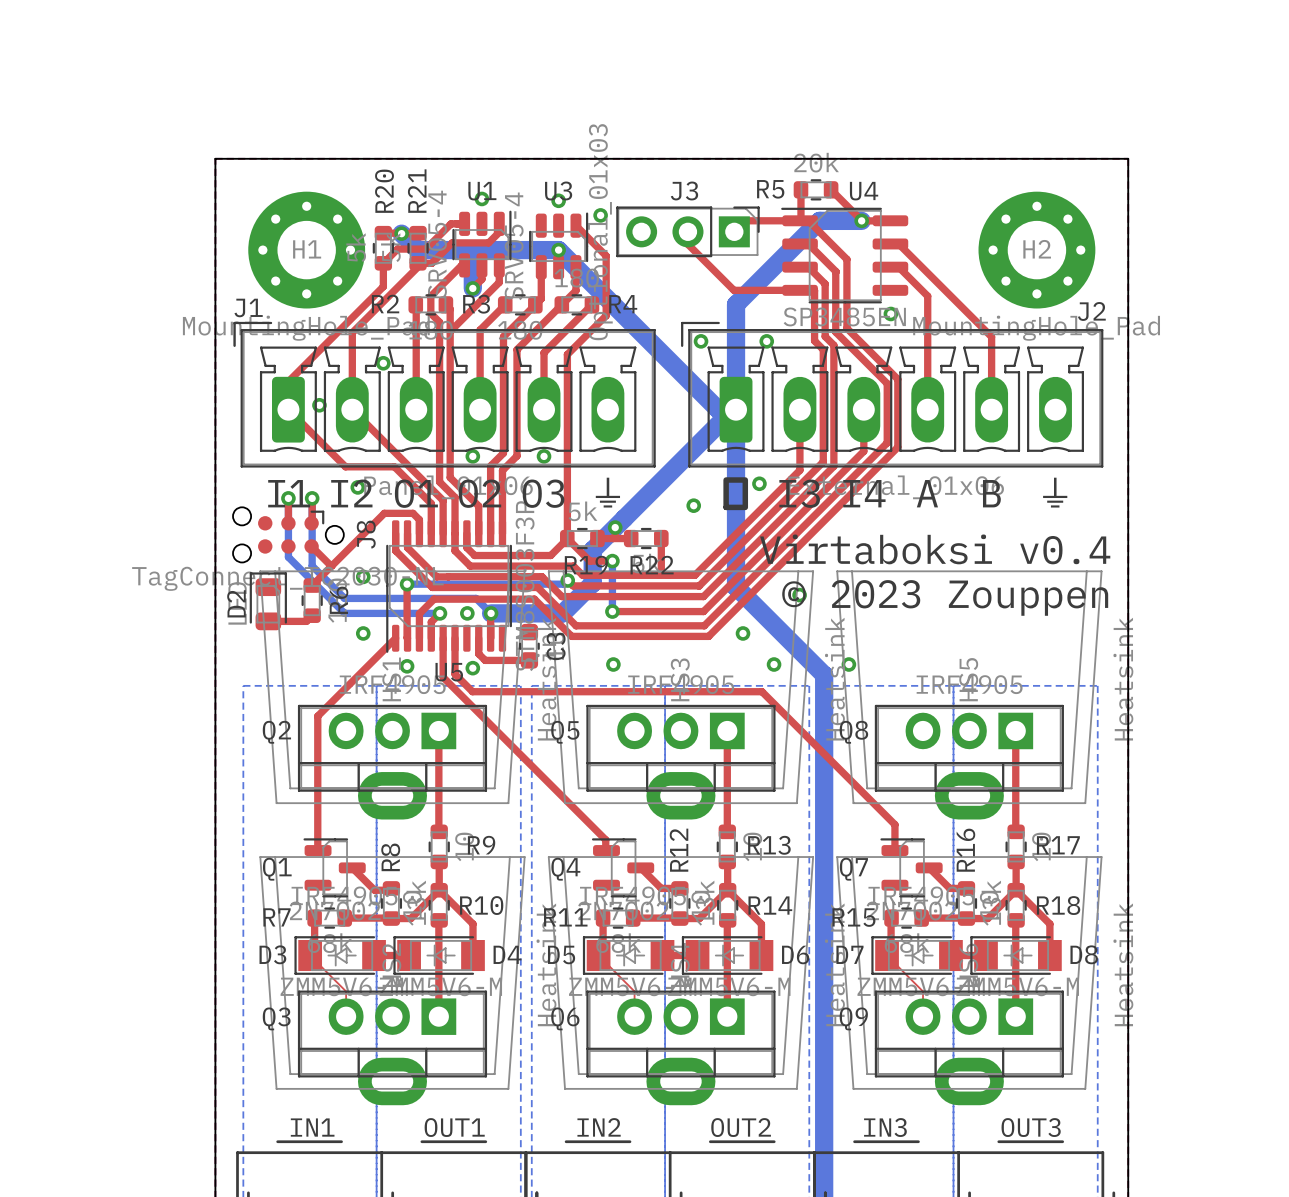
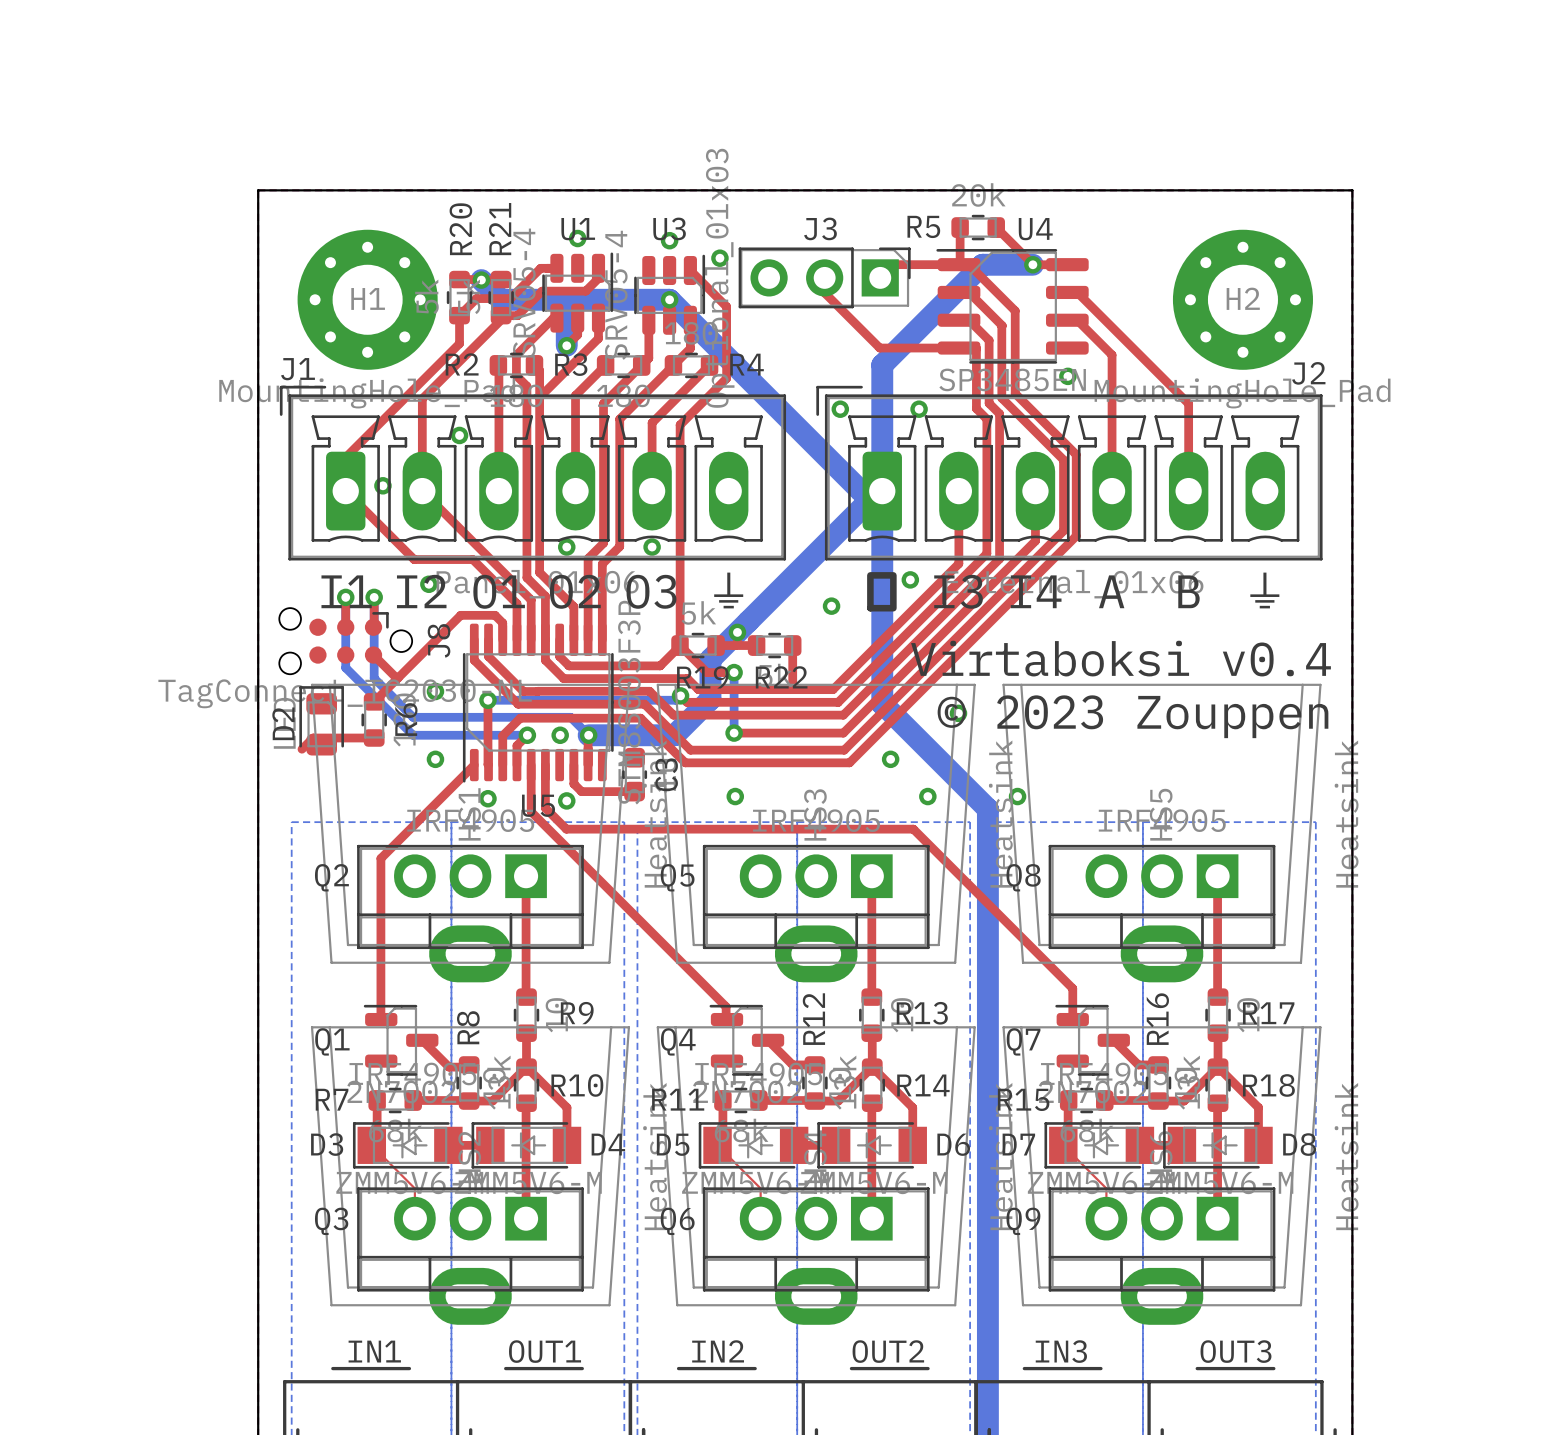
top track: (312, 615) (306, 621) (268, 621) -> (374, 738) (313, 738) (301, 749)

